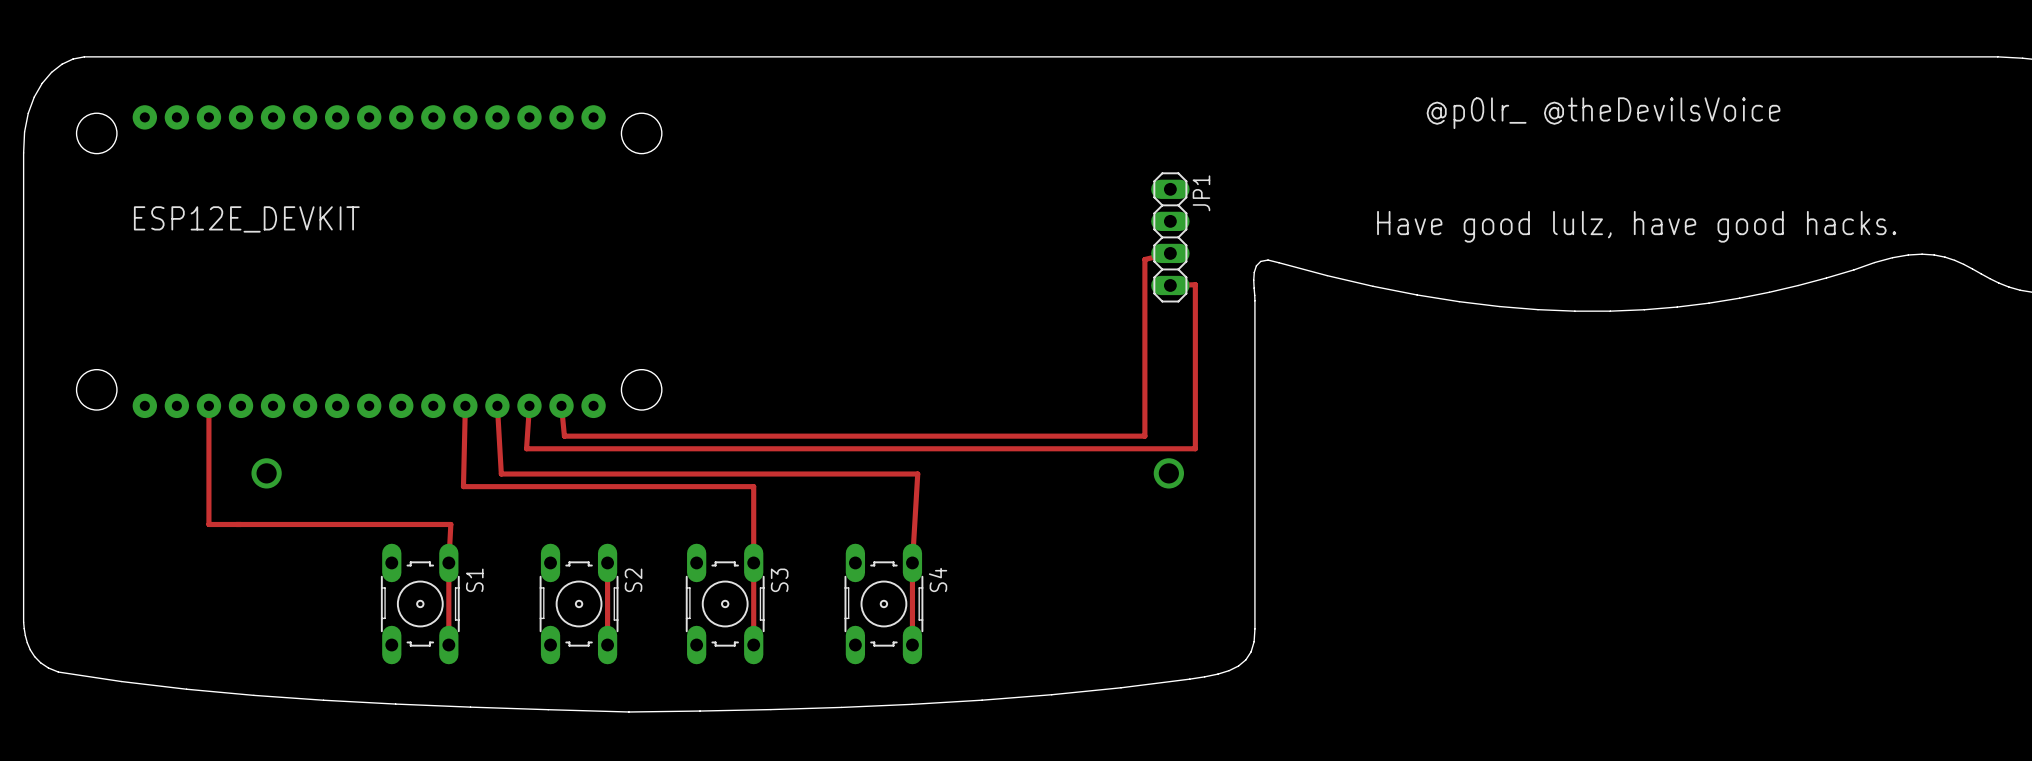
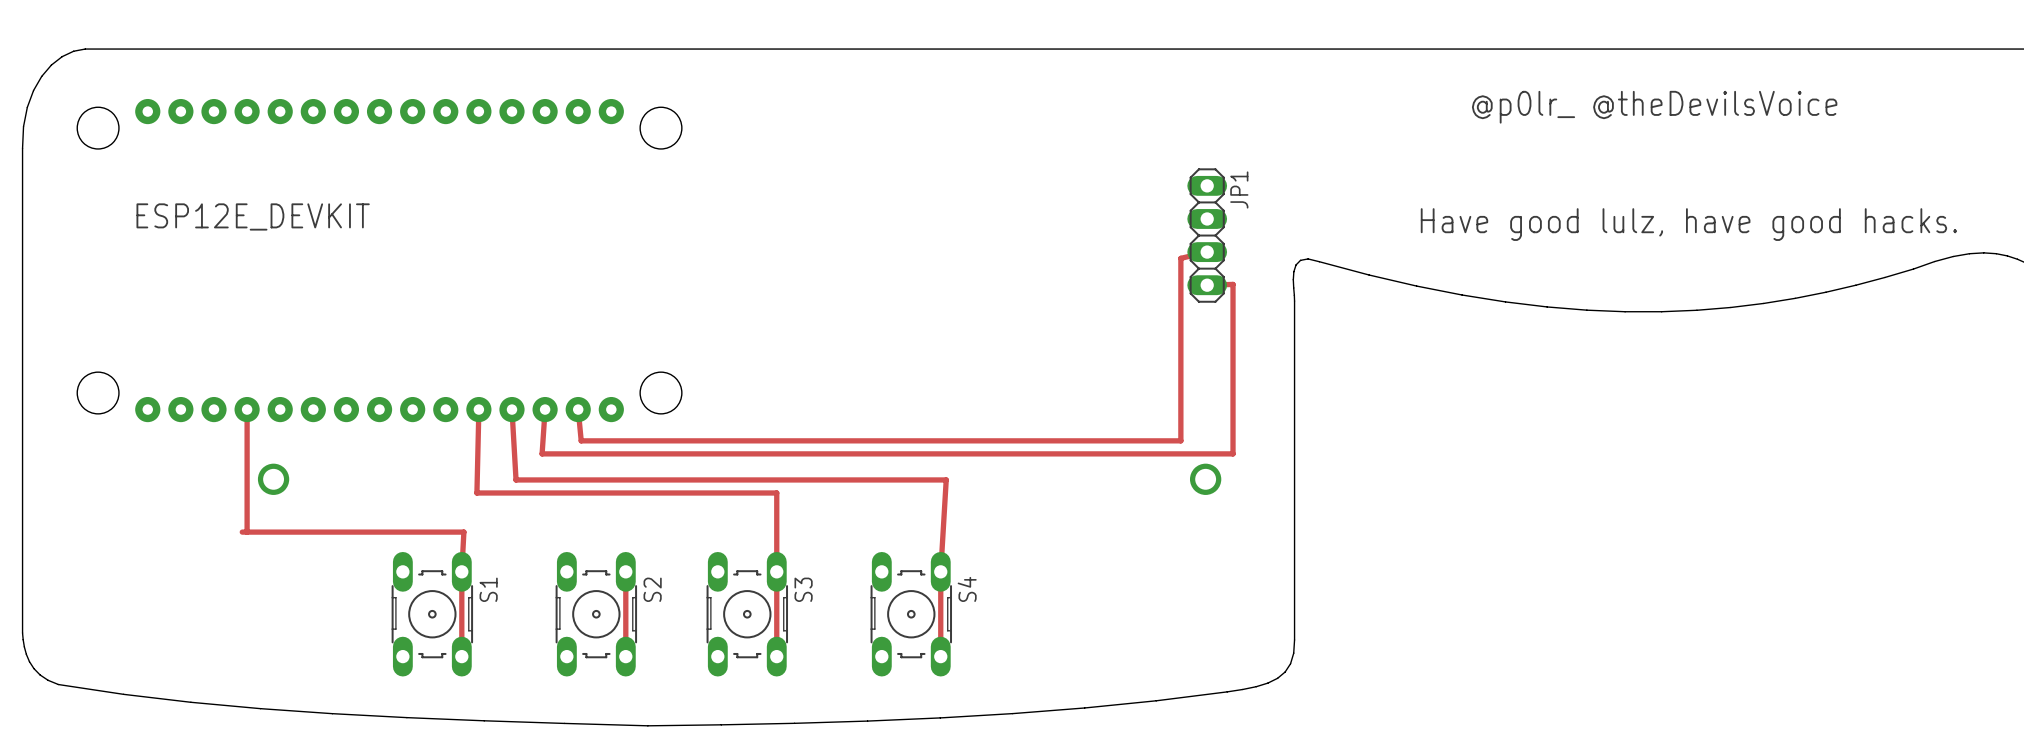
track: (208, 405) (208, 524) (236, 524) -> none
track: none -> (247, 409) (247, 532)

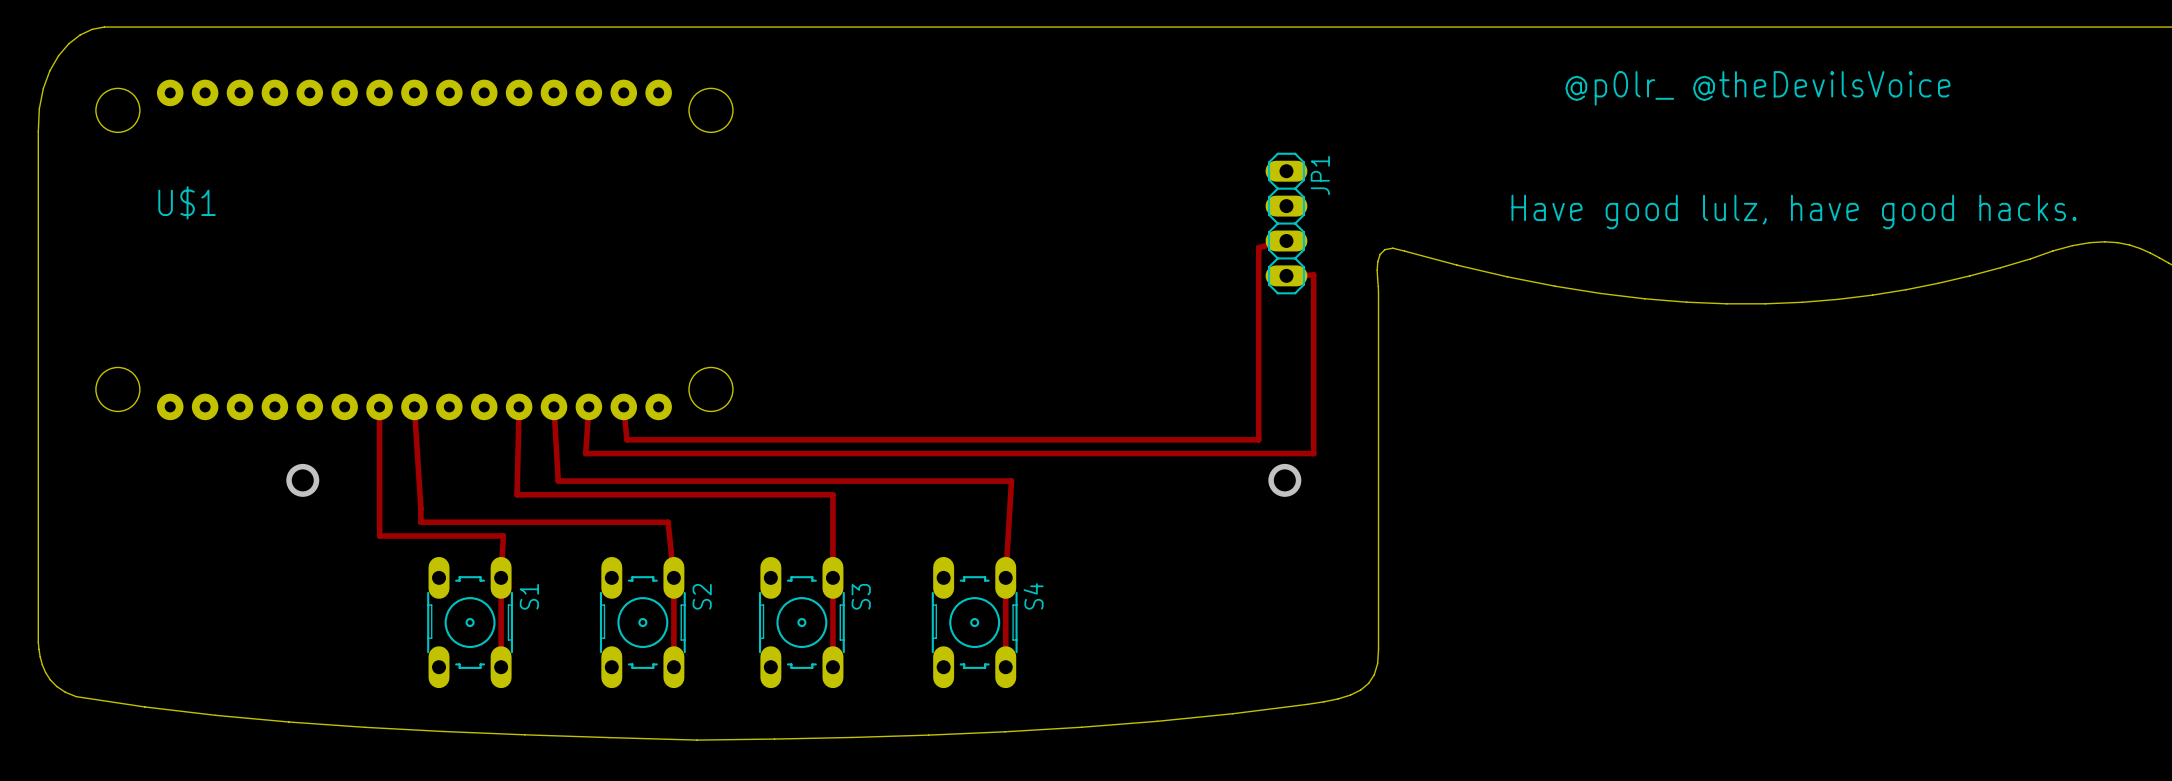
ESP12E_DEVKIT name: ESP12E_DEVKIT (253, 216) -> U$1 (187, 202)
track: (247, 409) (247, 532) -> none
track: none -> (414, 406) (420, 522) (668, 522) (673, 577)
track: (242, 532) (346, 532) -> (379, 406) (379, 536)

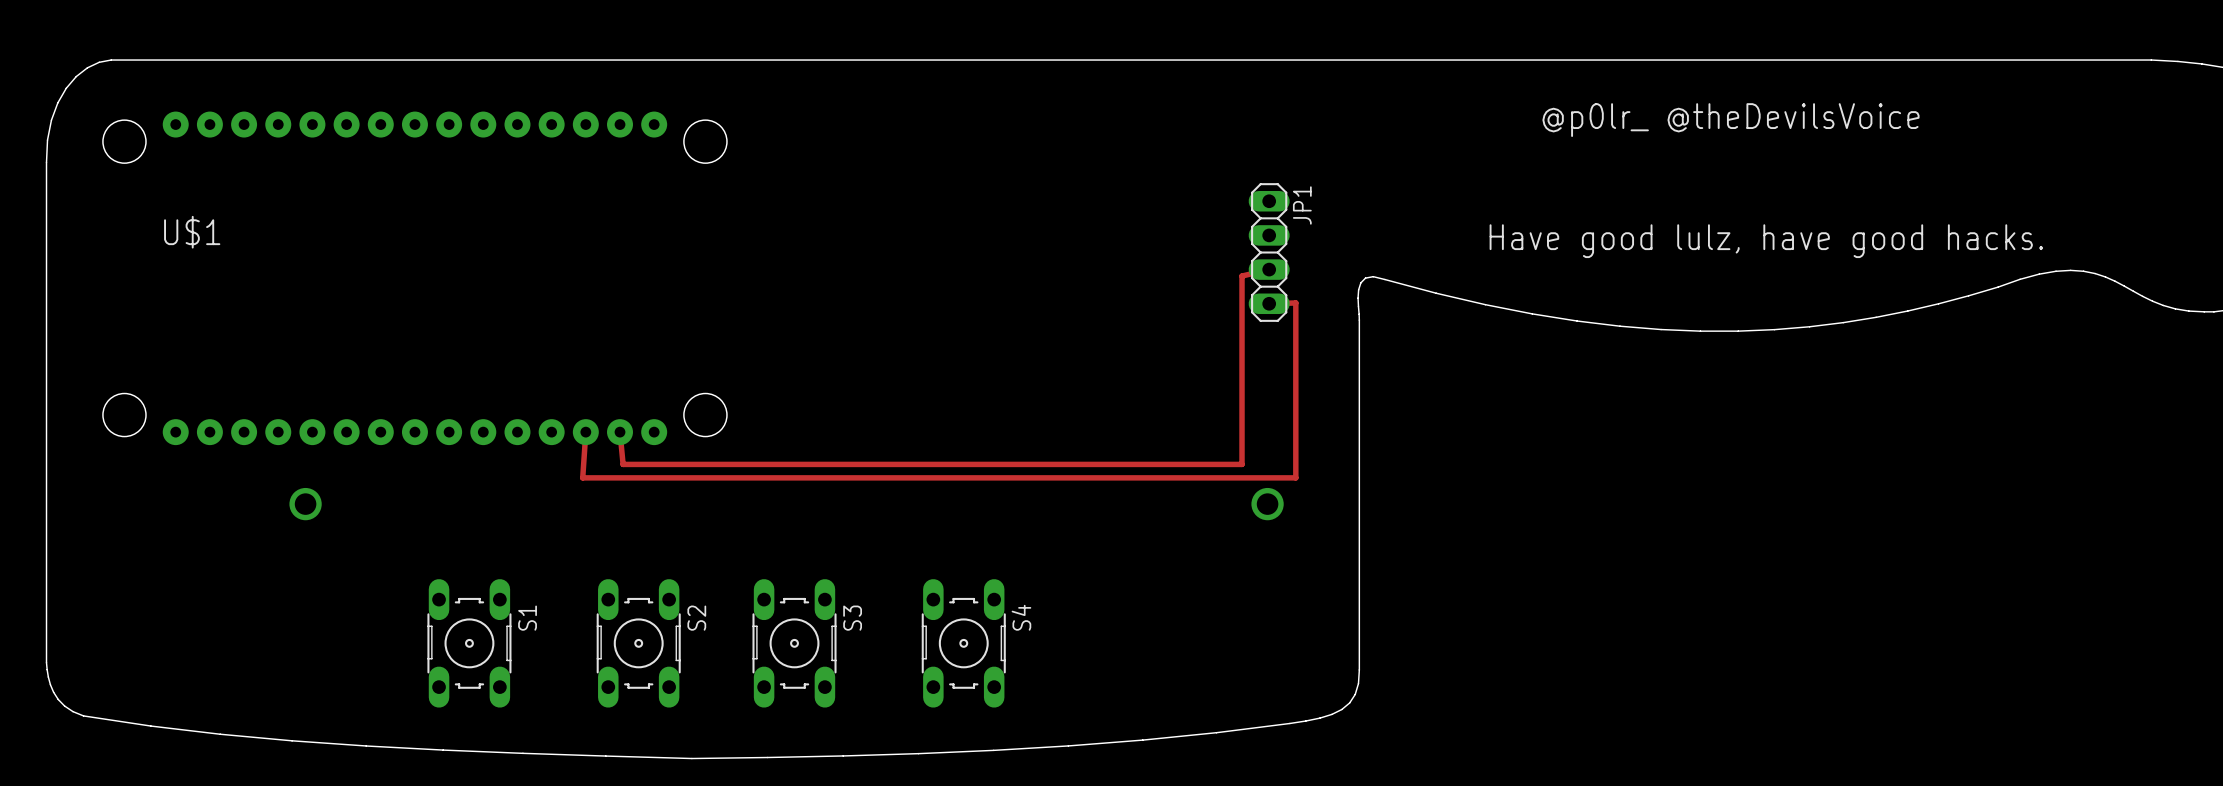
track: (379, 406) (379, 536) (503, 536) (501, 667) -> none
track: (414, 406) (420, 522) (668, 522) (673, 577) (673, 667) -> none
track: (519, 406) (517, 494) (832, 494) (832, 667) -> none
track: (553, 406) (558, 481) (1011, 481) (1005, 577) (1005, 667) -> none

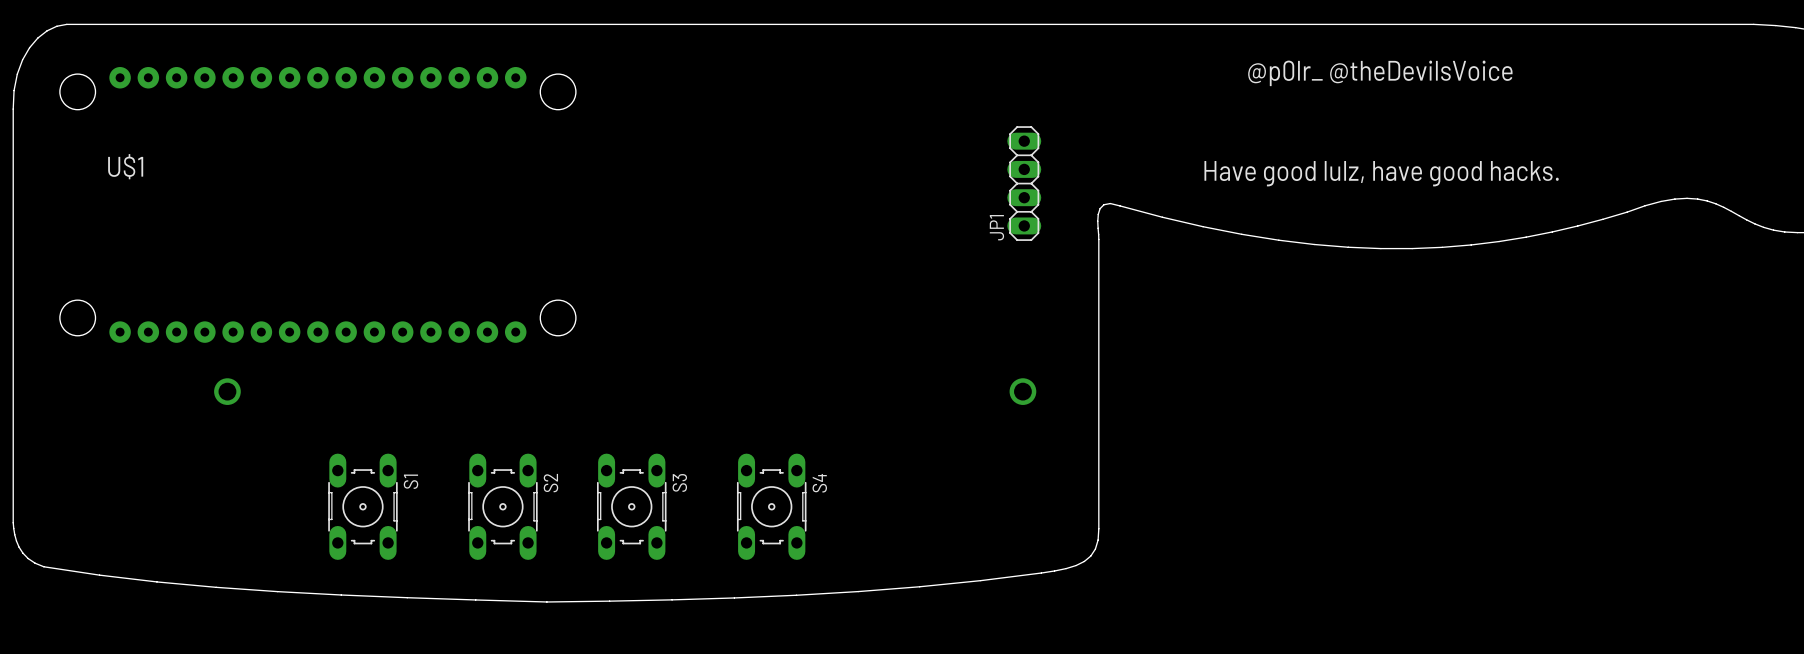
JP1 name position: JP1 (1302, 205) -> JP1 (996, 227)
track: (1269, 269) (1242, 276) (1242, 464) (623, 464) (620, 432) -> none
track: (1269, 303) (1295, 302) (1295, 477) (582, 477) (585, 432) -> none

